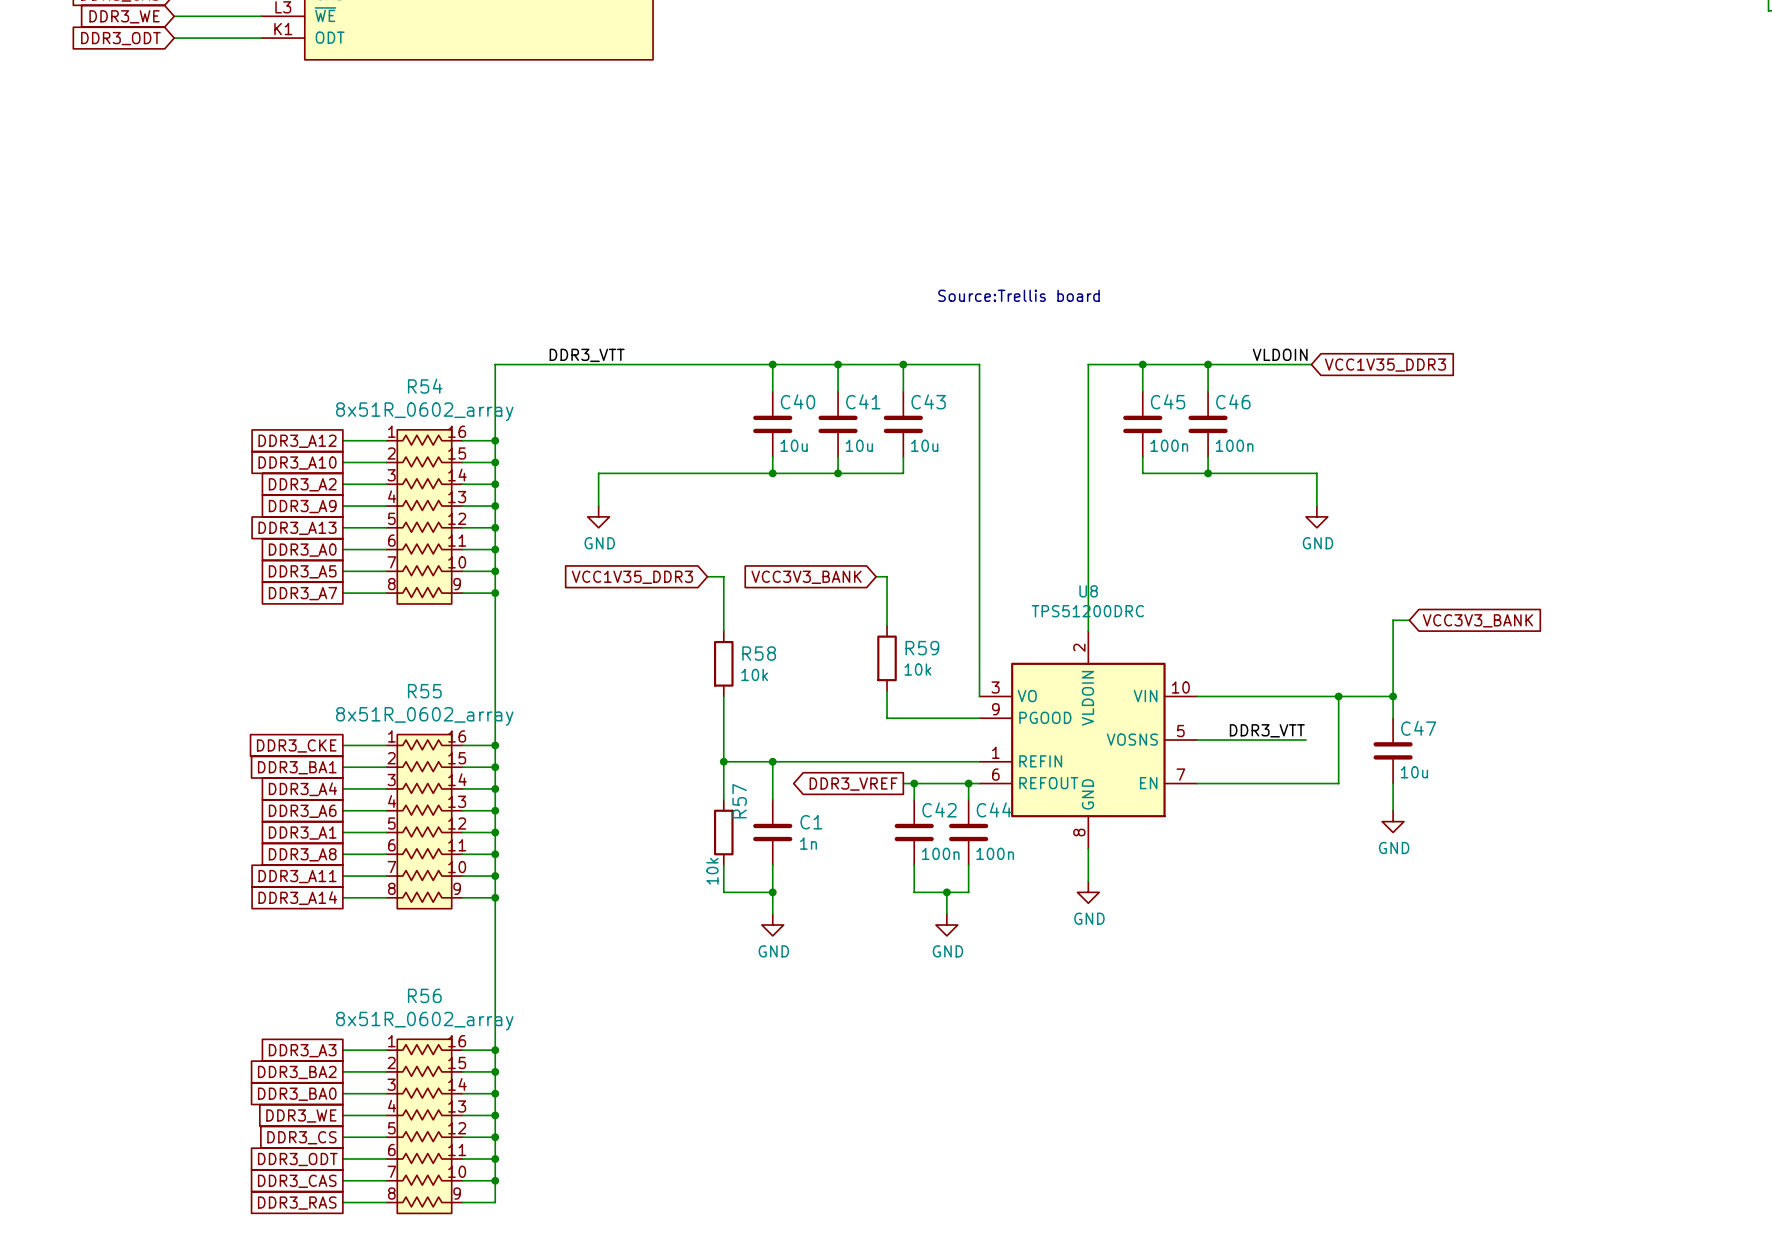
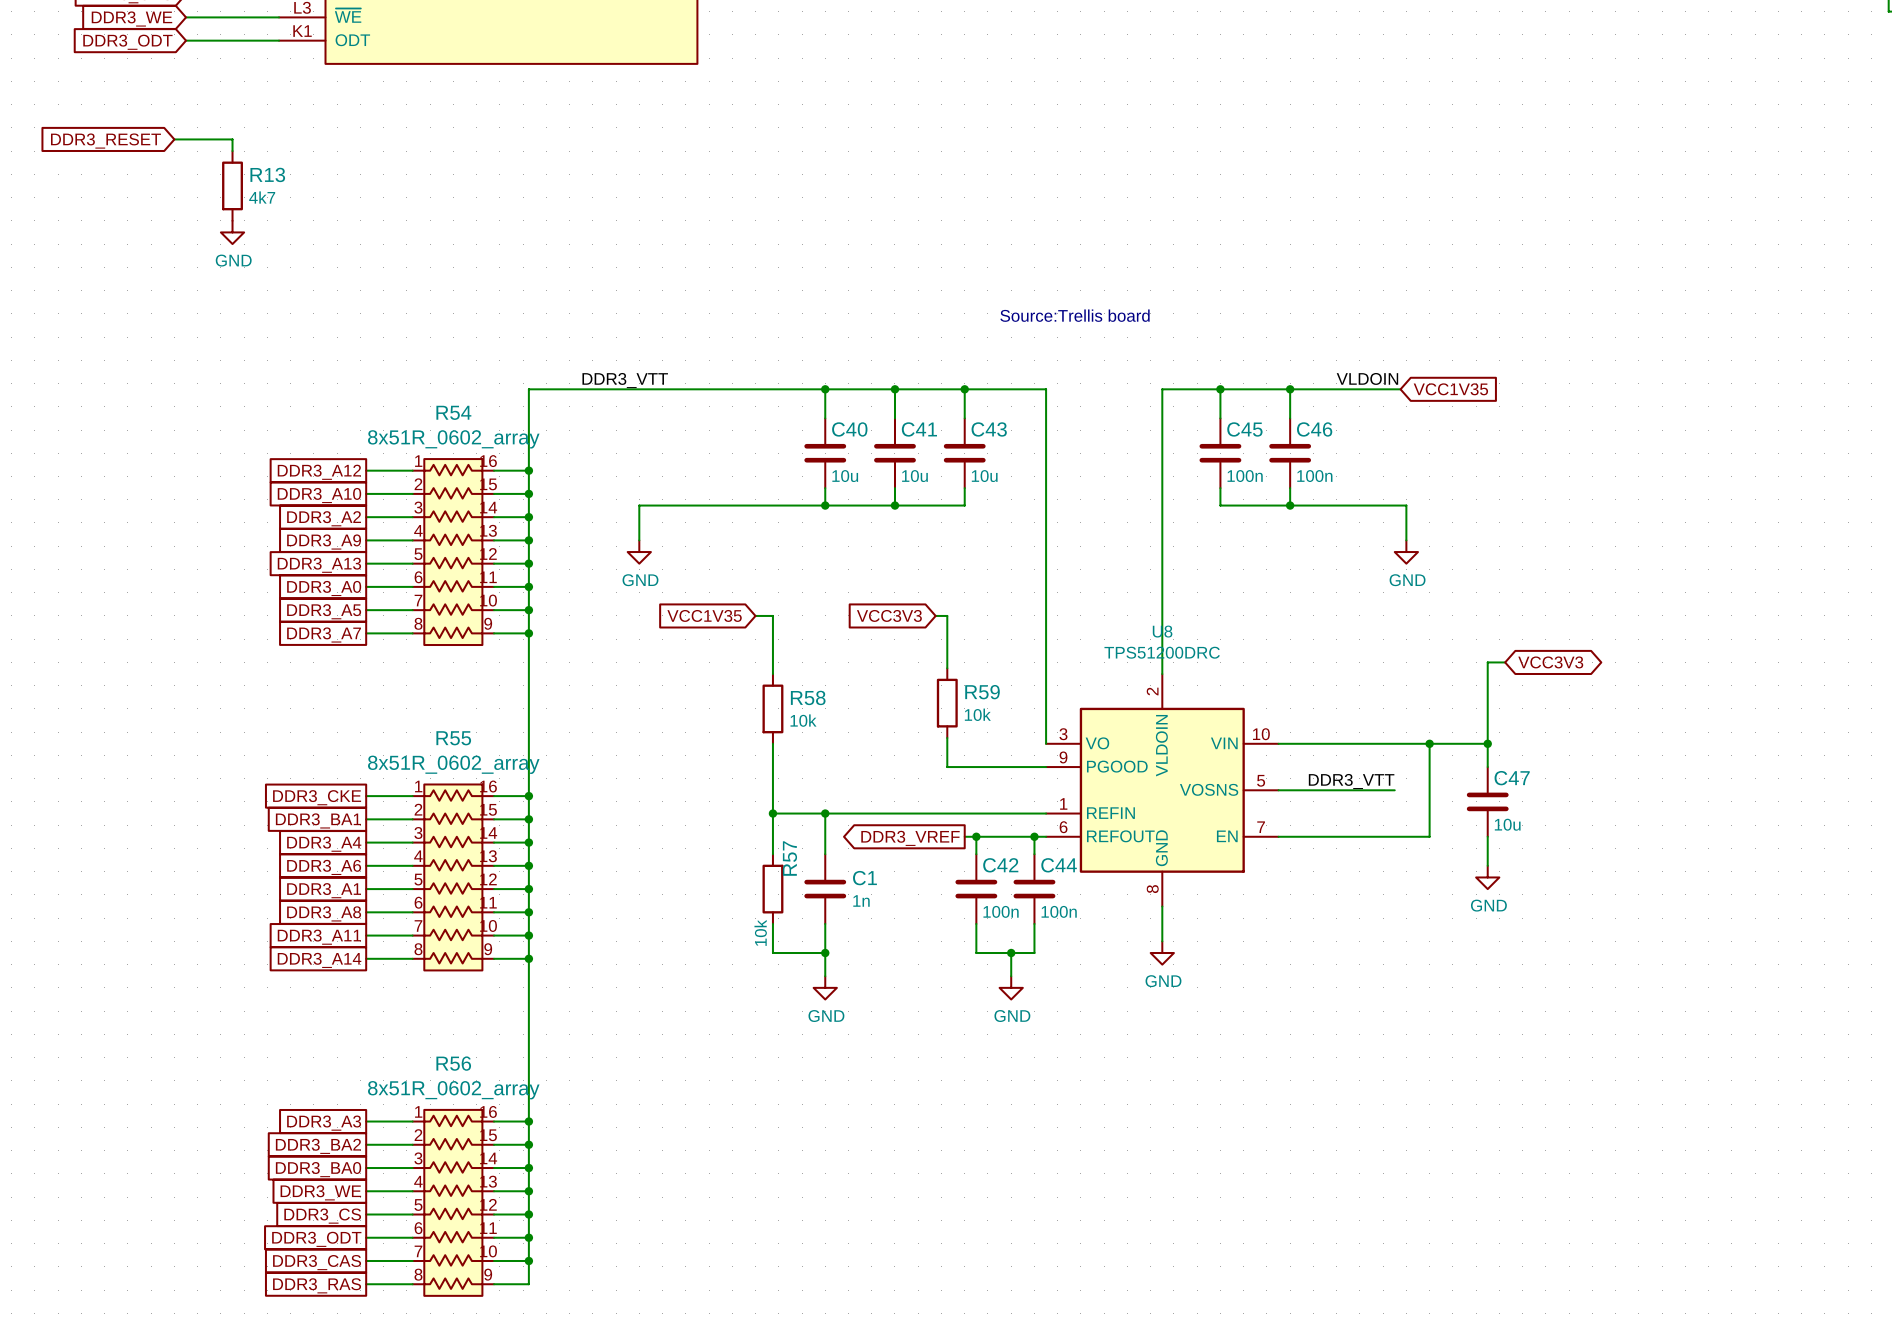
wire: none -> (174, 139) (232, 139) (232, 151)
global label: none -> DDR3_RESET (105, 141)
R13: none -> (232, 185)
power symbol: none -> GND (232, 232)
global label: VCC1V35_DDR3 (1385, 365) -> VCC1V35 (1450, 389)
global label: VCC1V35_DDR3 (632, 577) -> VCC1V35 (704, 615)
global label: VCC3V3_BANK (806, 577) -> VCC3V3 (889, 615)
global label shape: input (1477, 620) -> bidirectional (1550, 662)
global label: VCC3V3_BANK (1477, 620) -> VCC3V3 (1550, 662)

